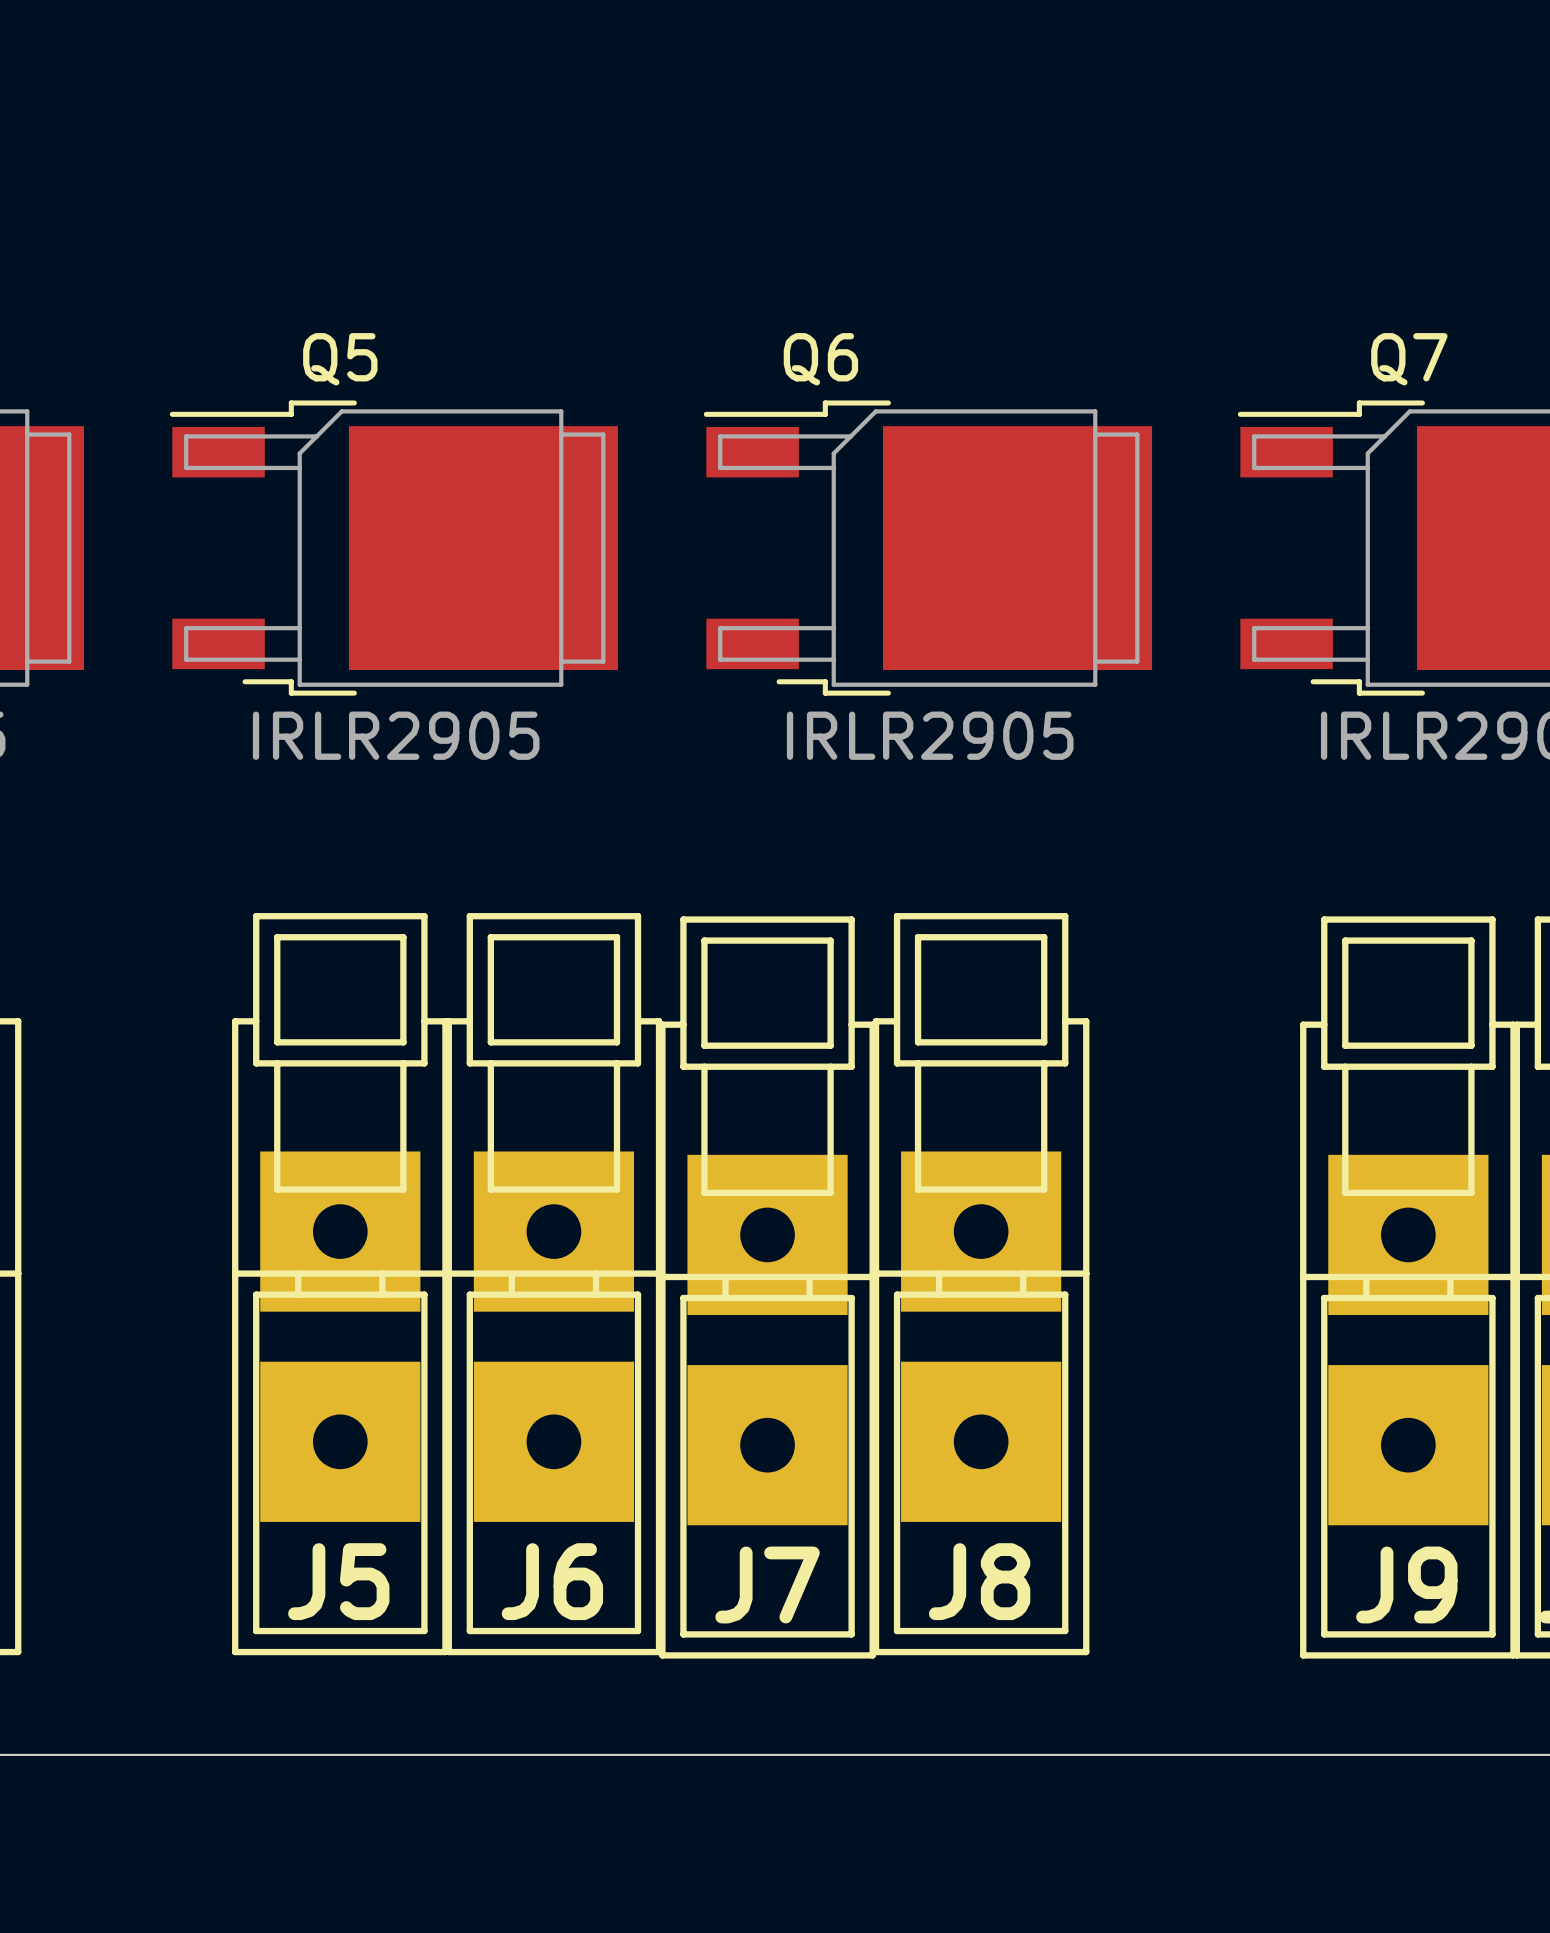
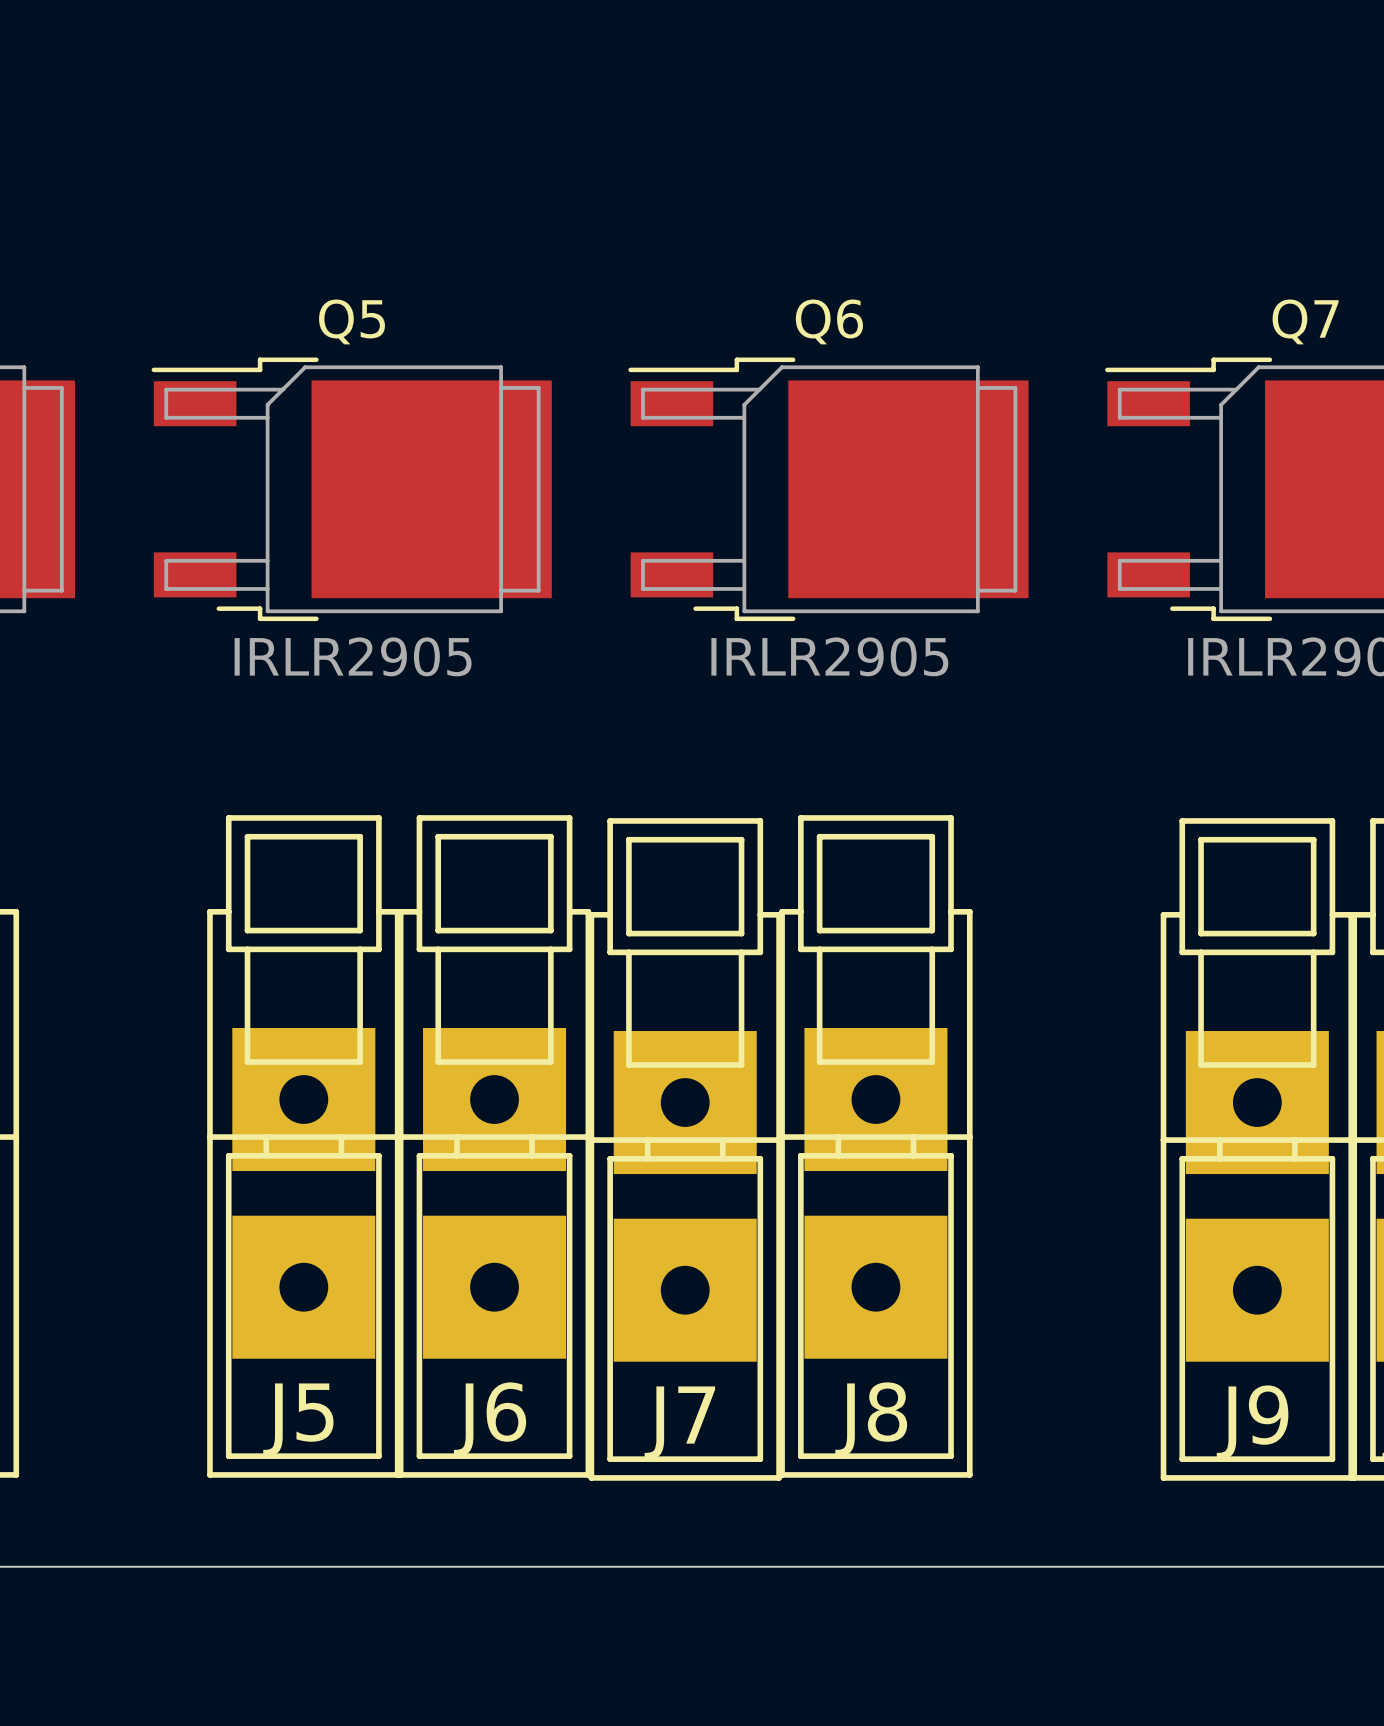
Q5 name position: Q5 (340, 359) -> Q5 (352, 321)
Q6 name position: Q6 (820, 359) -> Q6 (829, 321)
Q7 name position: Q7 (1409, 359) -> Q7 (1305, 321)

